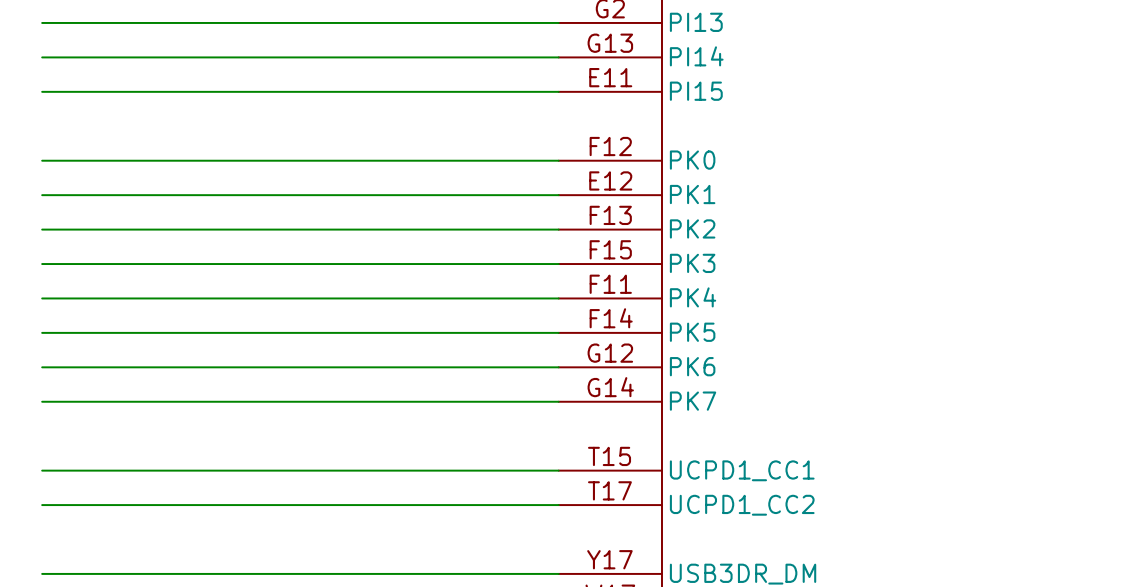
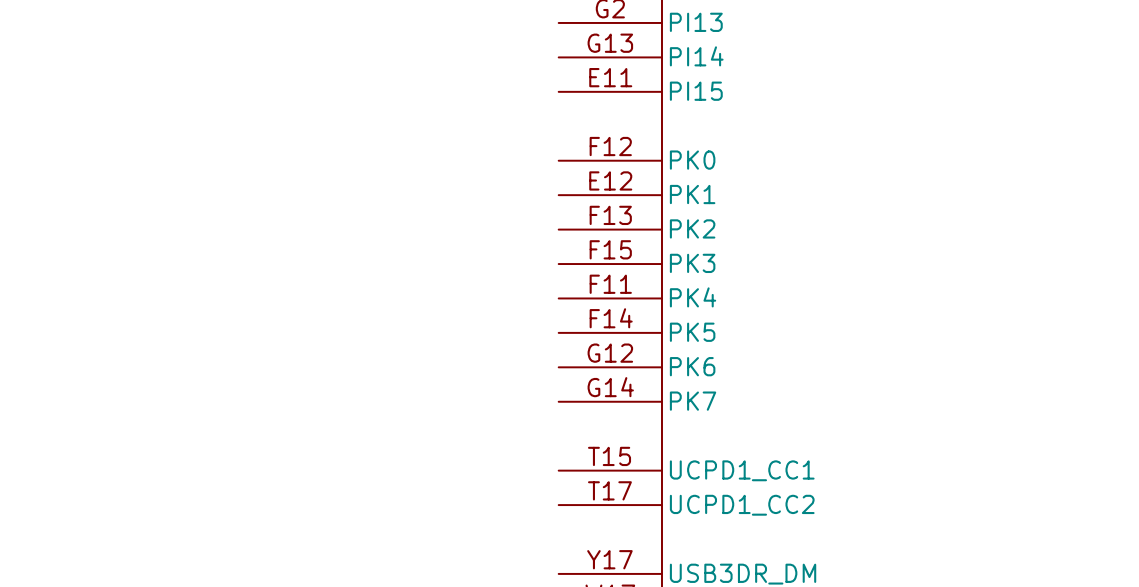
wire: (42, 22) (558, 22) -> none
wire: (42, 57) (558, 57) -> none
wire: (42, 91) (558, 91) -> none
wire: (42, 160) (558, 160) -> none
wire: (42, 195) (558, 195) -> none
wire: (42, 229) (558, 229) -> none
wire: (42, 264) (558, 264) -> none
wire: (42, 298) (558, 298) -> none
wire: (42, 332) (558, 332) -> none
wire: (42, 367) (558, 367) -> none
wire: (42, 401) (558, 401) -> none
wire: (42, 470) (558, 470) -> none
wire: (42, 505) (558, 505) -> none
wire: (42, 573) (558, 573) -> none

